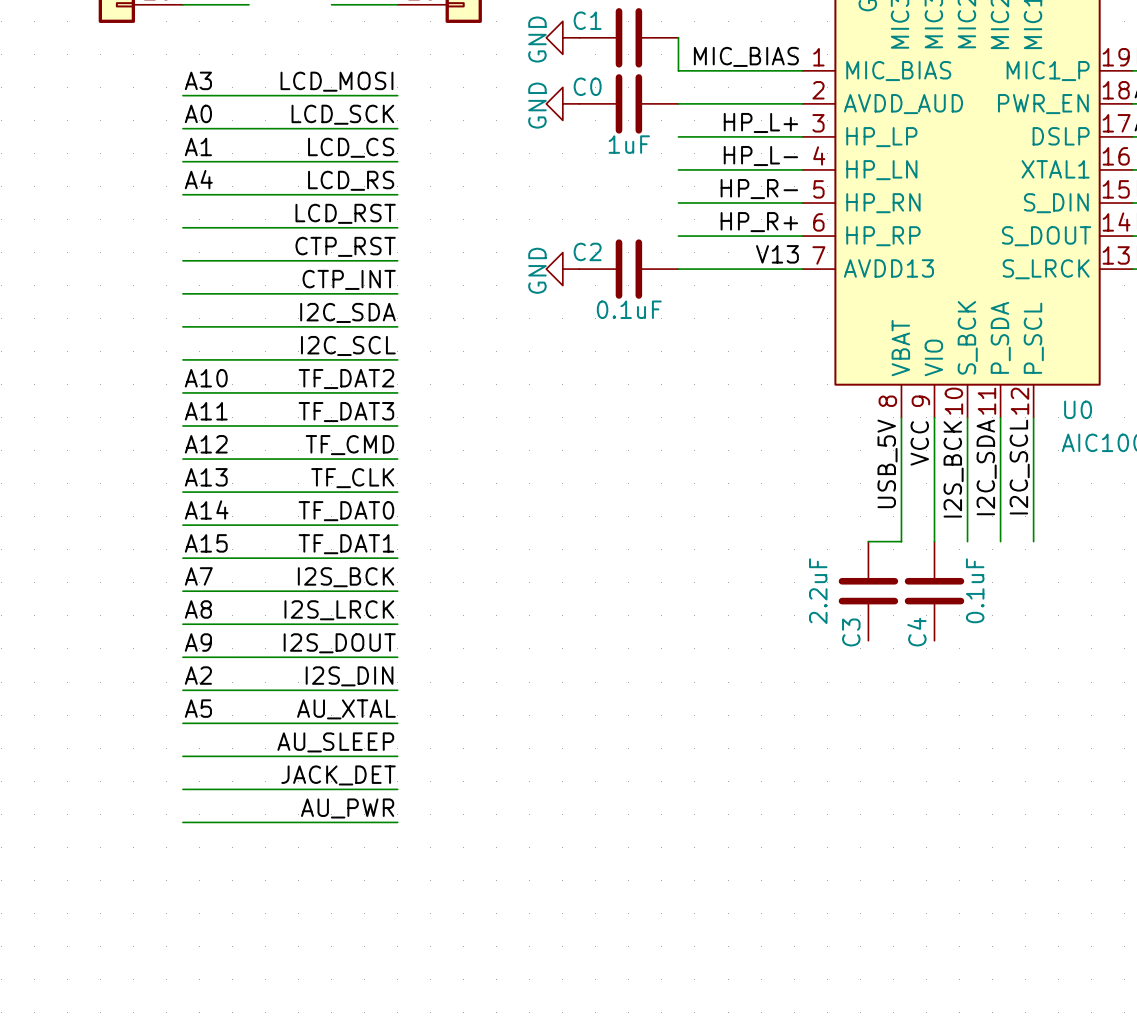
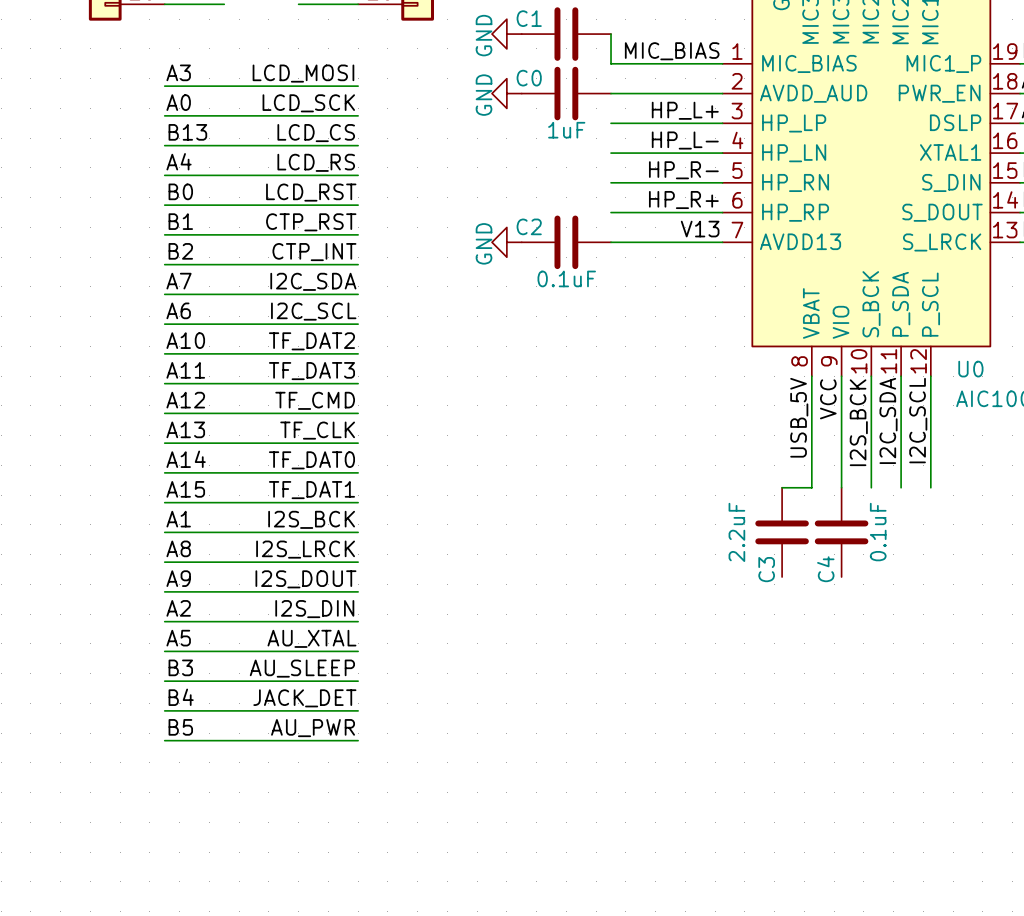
label: A1 (198, 146) -> B13 (187, 132)
label: none -> B0 (180, 191)
label: none -> B1 (180, 221)
label: none -> B2 (180, 251)
label: none -> A7 (179, 281)
label: none -> A6 (178, 310)
label: A7 (198, 576) -> A1 (178, 519)
label: none -> B3 (180, 667)
label: none -> B4 (181, 697)
label: none -> B5 (180, 727)

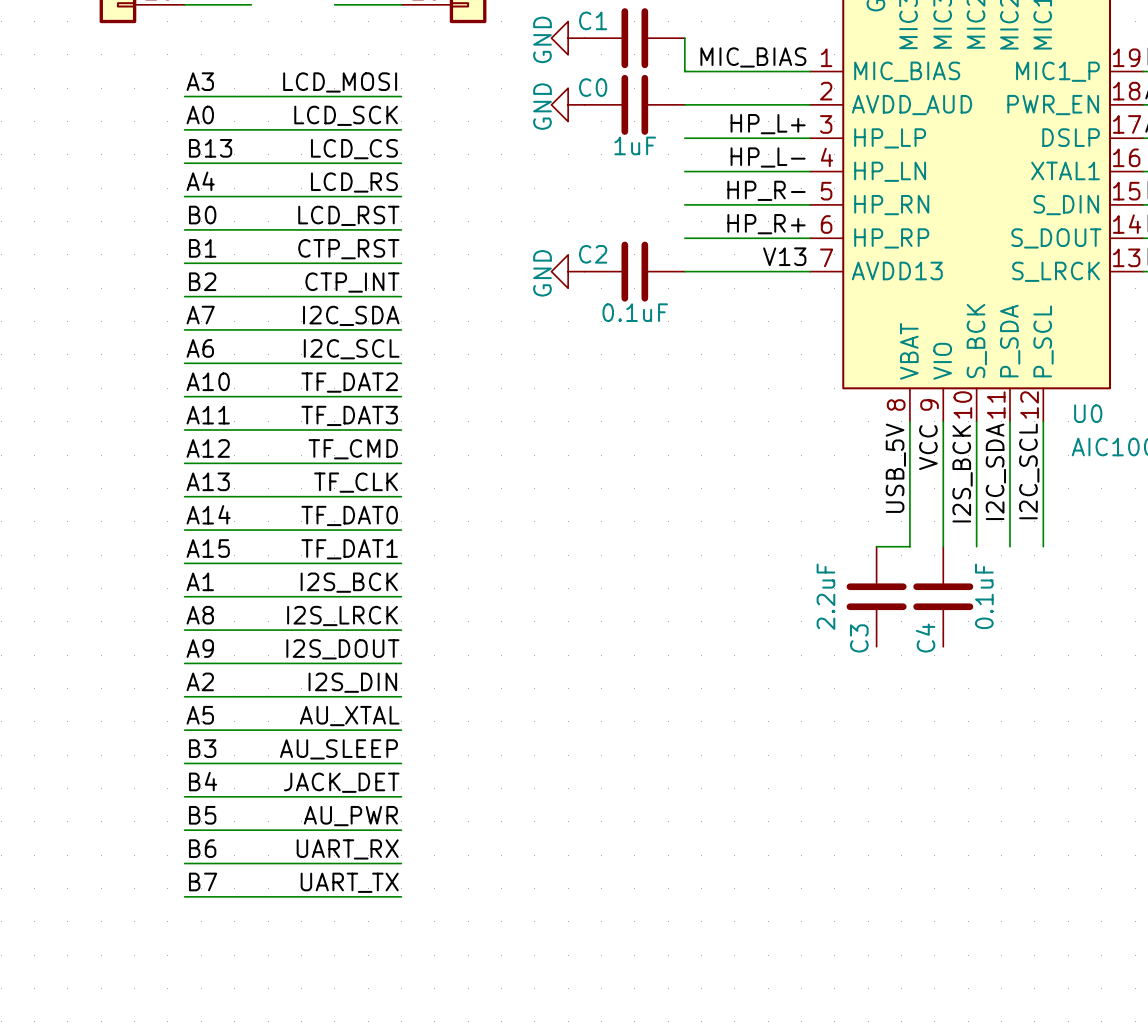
label: none -> B6 (202, 848)
label: none -> UART_RX (347, 849)
wire: none -> (184, 863) (401, 863)
label: none -> B7 (203, 881)
label: none -> UART_TX (349, 882)
wire: none -> (184, 896) (401, 896)

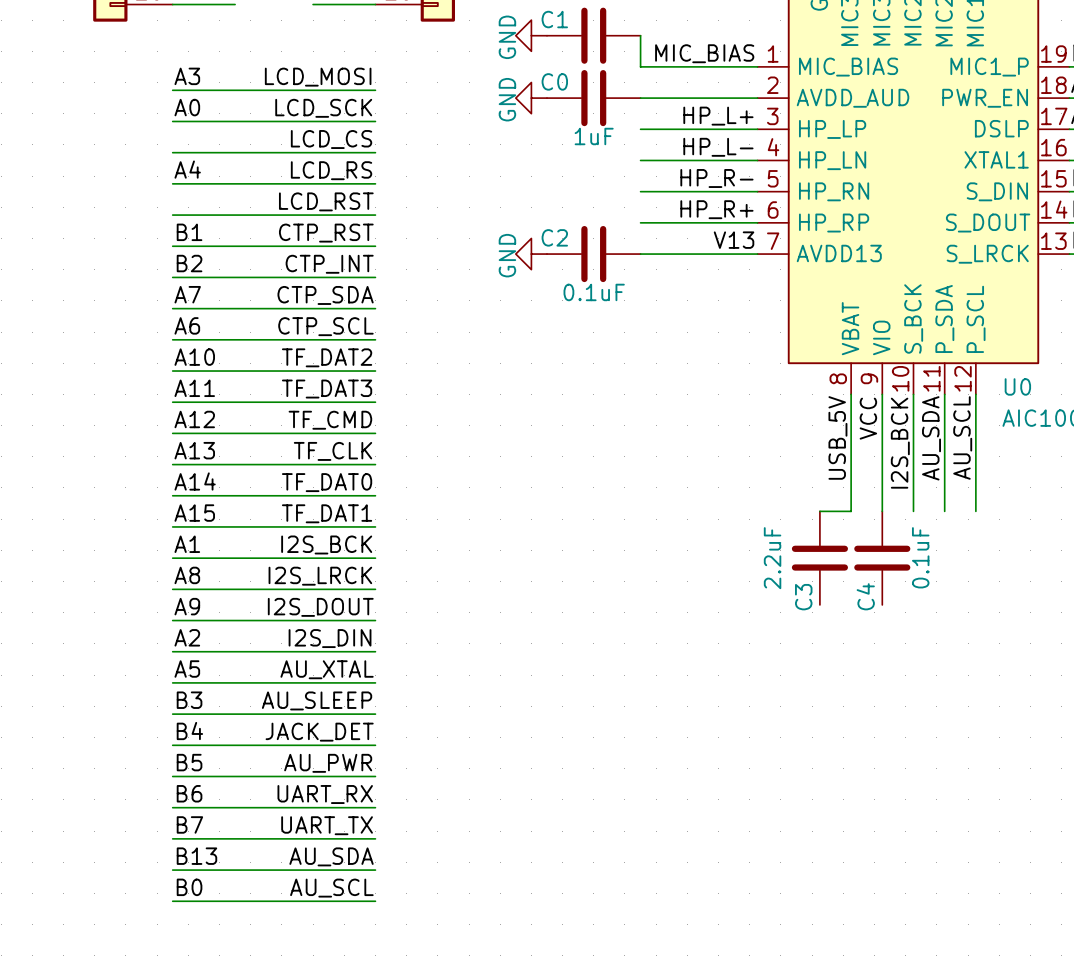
label: B13 (210, 148) -> none
label: B0 (202, 215) -> none
label: I2C_SDA (351, 315) -> CTP_SDA (325, 295)
label: I2C_SCL (351, 349) -> CTP_SCL (325, 326)
label: I2C_SDA (995, 471) -> AU_SDA (931, 438)
label: I2C_SCL (1029, 471) -> AU_SCL (962, 437)
label: none -> B13 (196, 856)
label: none -> AU_SDA (331, 856)
wire: none -> (172, 870) (375, 870)
label: none -> B0 (189, 887)
label: none -> AU_SCL (331, 888)
wire: none -> (172, 901) (375, 901)

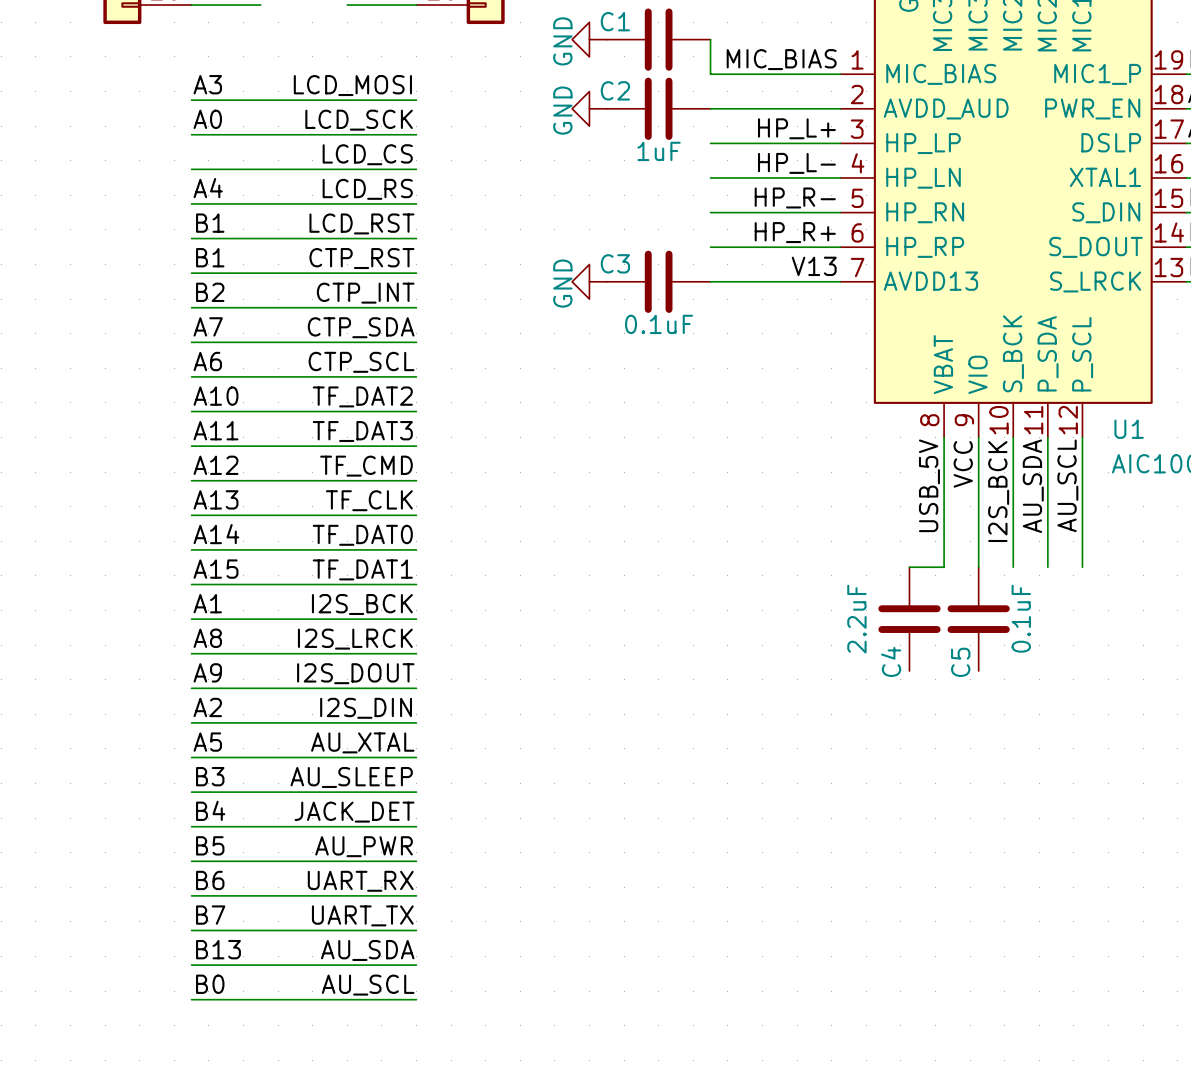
C0 name: C0 (554, 81) -> C2 (615, 90)
label: none -> B1 (210, 223)
C2 name: C2 (554, 237) -> C3 (615, 263)
U0 name: U0 (1017, 386) -> U1 (1129, 429)
C4 name: C4 (865, 596) -> C5 (960, 662)
C3 name: C3 (803, 597) -> C4 (891, 661)

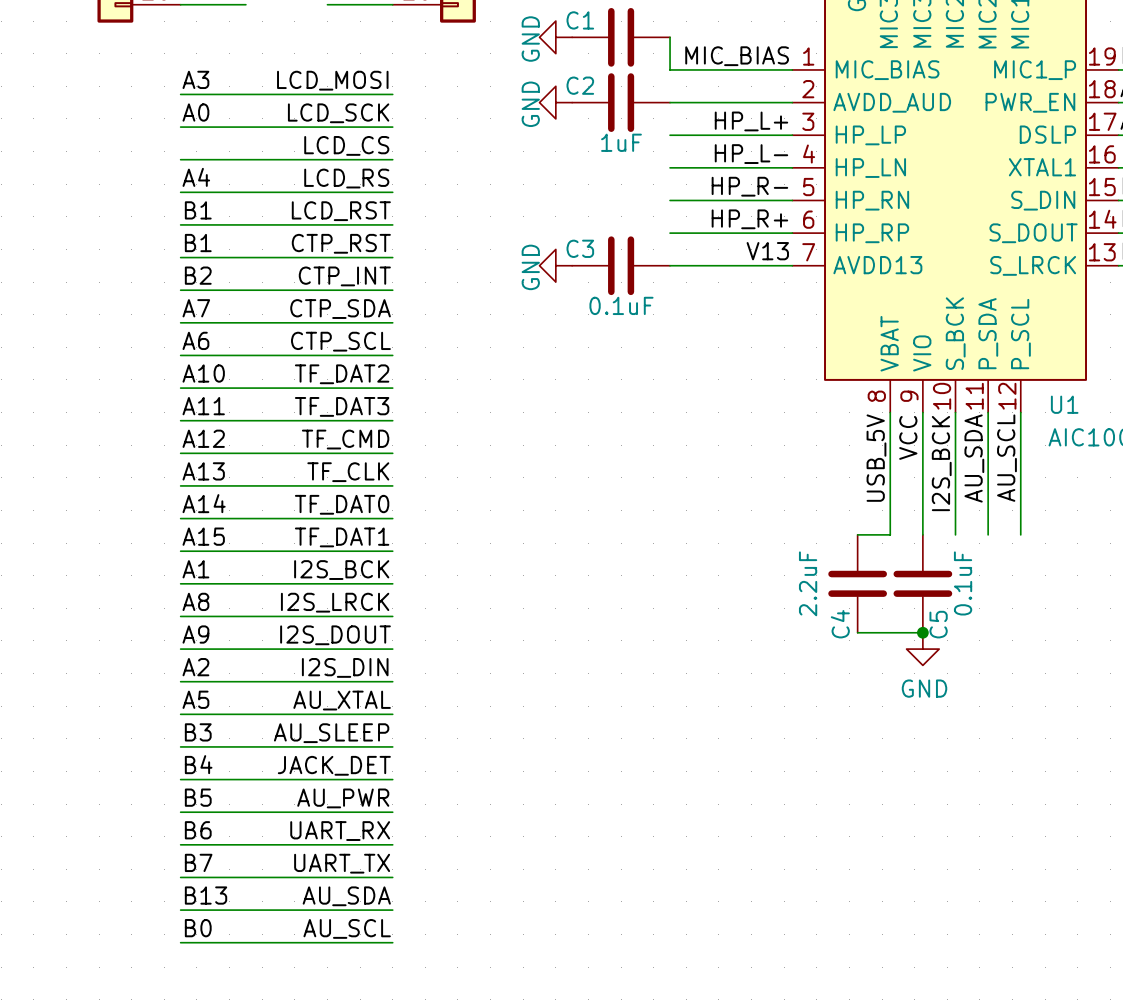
C5 name position: C5 (960, 662) -> C5 (938, 624)
wire: none -> (857, 632) (922, 632)
junction: none -> (922, 632)
power symbol: none -> GND (922, 649)

